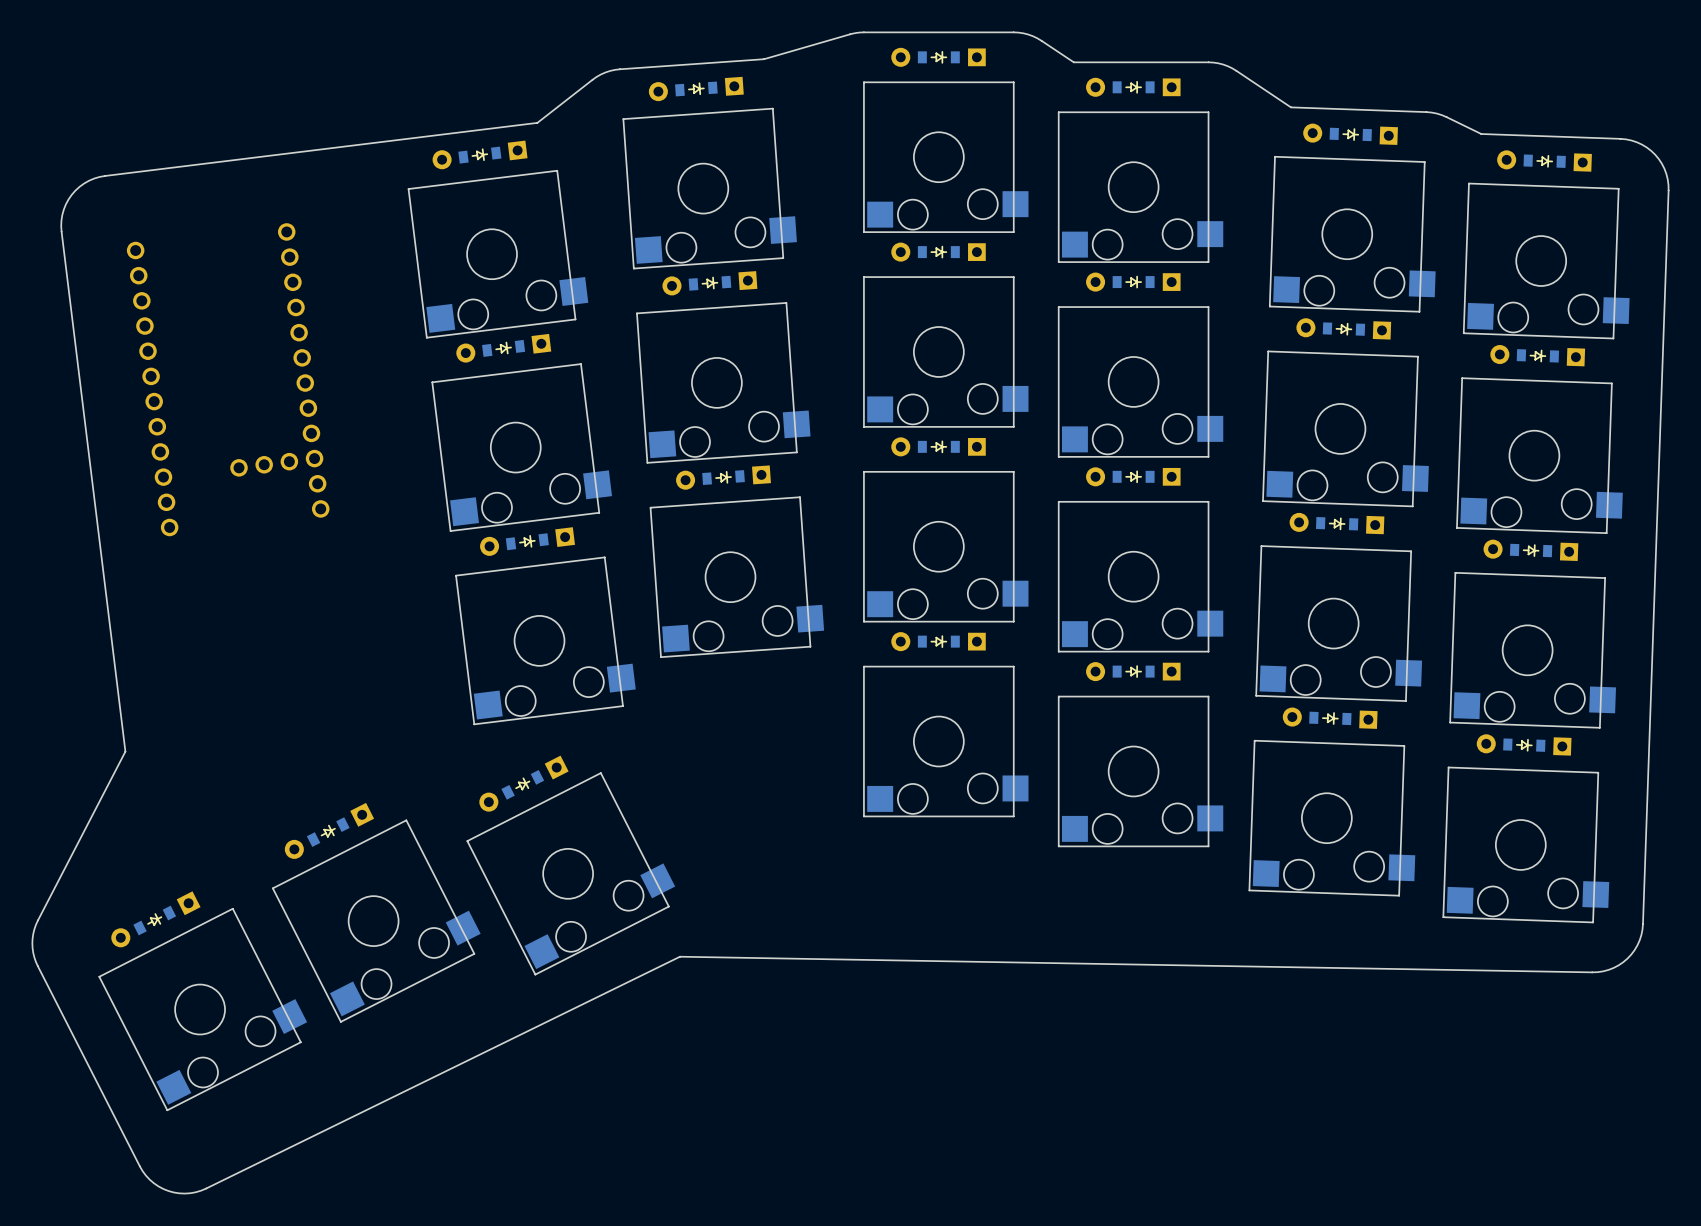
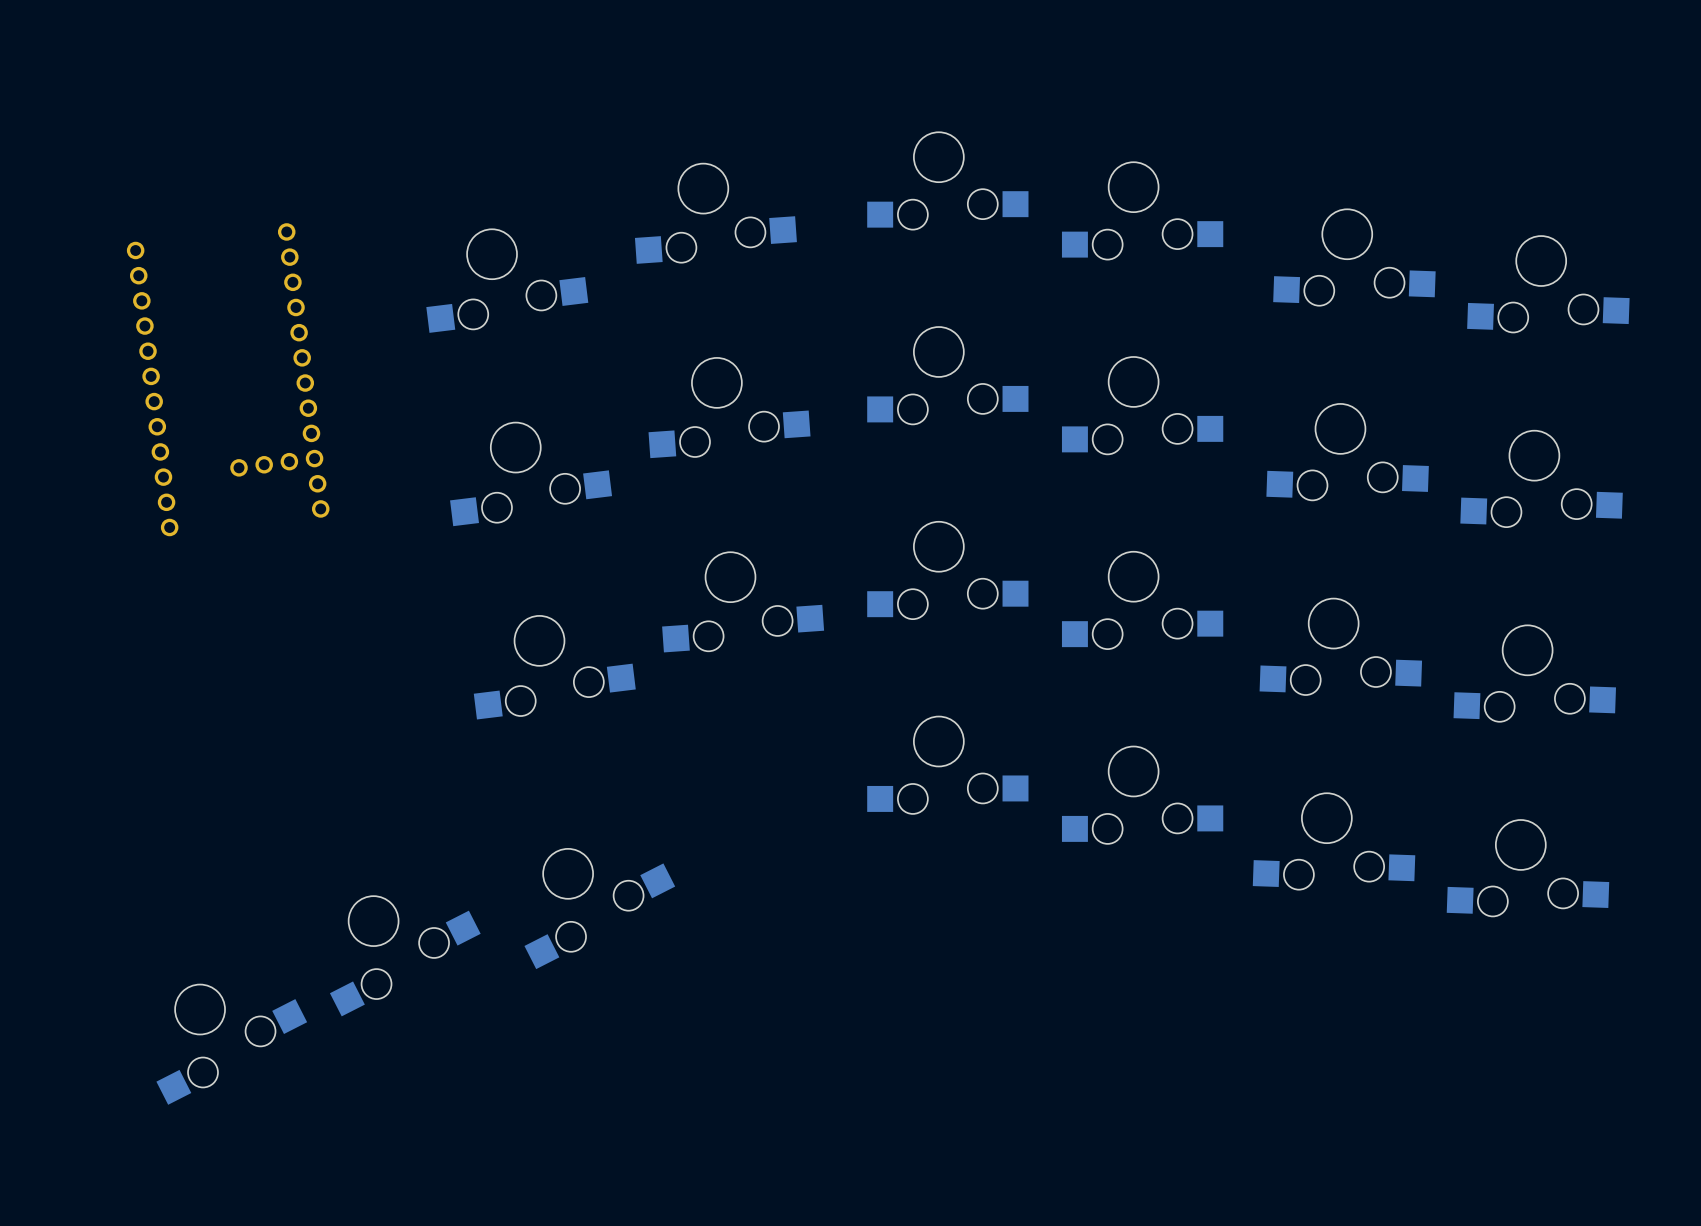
board edge: (1013, 32) (860, 32) (764, 59) (614, 69) (596, 76) (537, 122) (105, 175) (89, 180) (71, 194) (63, 209) (61, 231) (125, 751) (37, 920) (33, 933) (32, 947) (37, 966) (139, 1166) (153, 1183) (163, 1188) (179, 1193) (195, 1192) (206, 1188) (680, 956) (1592, 972) (1608, 969) (1618, 965) (1634, 950) (1641, 935) (1642, 924) (1668, 190) (1666, 173) (1658, 159) (1641, 144) (1626, 139) (1481, 134) (1446, 117) (1431, 112) (1290, 107) (1236, 70) (1223, 64) (1208, 62) (1073, 62) (1037, 38) (1013, 32) -> none
part: (938, 57) -> none
board edge: (1013, 82) (1013, 232) (863, 232) (863, 82) (1013, 82) -> none
part: (1133, 87) -> none
part: (696, 88) -> none
board edge: (772, 108) (783, 258) (633, 268) (623, 119) (772, 108) -> none
board edge: (1208, 112) (1208, 262) (1058, 262) (1058, 112) (1208, 112) -> none
part: (1350, 134) -> none
part: (480, 154) -> none
board edge: (1275, 156) (1269, 306) (1419, 311) (1424, 162) (1275, 156) -> none
part: (1544, 161) -> none
board edge: (557, 170) (575, 319) (426, 337) (408, 189) (557, 170) -> none
board edge: (1468, 183) (1463, 333) (1613, 338) (1618, 188) (1468, 183) -> none
part: (938, 252) -> none
board edge: (1013, 277) (1013, 426) (863, 426) (863, 277) (1013, 277) -> none
part: (1133, 282) -> none
part: (709, 283) -> none
board edge: (786, 302) (796, 452) (647, 462) (636, 313) (786, 302) -> none
board edge: (1208, 307) (1208, 456) (1058, 456) (1058, 307) (1208, 307) -> none
part: (1343, 328) -> none
part: (503, 348) -> none
board edge: (1268, 351) (1262, 501) (1412, 506) (1417, 356) (1268, 351) -> none
part: (1537, 355) -> none
board edge: (580, 364) (599, 512) (450, 531) (432, 382) (580, 364) -> none
board edge: (1462, 378) (1456, 527) (1606, 533) (1611, 383) (1462, 378) -> none
part: (938, 446) -> none
board edge: (1013, 471) (1013, 621) (863, 621) (863, 471) (1013, 471) -> none
part: (1133, 476) -> none
part: (723, 477) -> none
board edge: (800, 497) (650, 507) (660, 657) (810, 646) (800, 497) -> none
board edge: (1208, 501) (1208, 651) (1058, 651) (1058, 501) (1208, 501) -> none
part: (1336, 523) -> none
part: (527, 541) -> none
board edge: (1261, 546) (1256, 695) (1405, 701) (1411, 551) (1261, 546) -> none
part: (1530, 550) -> none
board edge: (604, 557) (456, 575) (474, 724) (622, 706) (604, 557) -> none
board edge: (1455, 572) (1450, 722) (1599, 727) (1605, 578) (1455, 572) -> none
part: (938, 641) -> none
board edge: (1013, 666) (863, 666) (863, 816) (1013, 816) (1013, 666) -> none
part: (1133, 671) -> none
board edge: (1208, 696) (1058, 696) (1058, 846) (1208, 846) (1208, 696) -> none
part: (1330, 718) -> none
board edge: (1254, 740) (1249, 890) (1399, 895) (1404, 745) (1254, 740) -> none
part: (1524, 744) -> none
board edge: (1448, 767) (1443, 917) (1593, 922) (1598, 772) (1448, 767) -> none
board edge: (600, 773) (467, 841) (535, 974) (668, 906) (600, 773) -> none
part: (523, 783) -> none
board edge: (406, 820) (272, 888) (340, 1021) (474, 953) (406, 820) -> none
part: (329, 830) -> none
board edge: (232, 908) (99, 976) (167, 1110) (300, 1042) (232, 908) -> none
part: (155, 919) -> none

